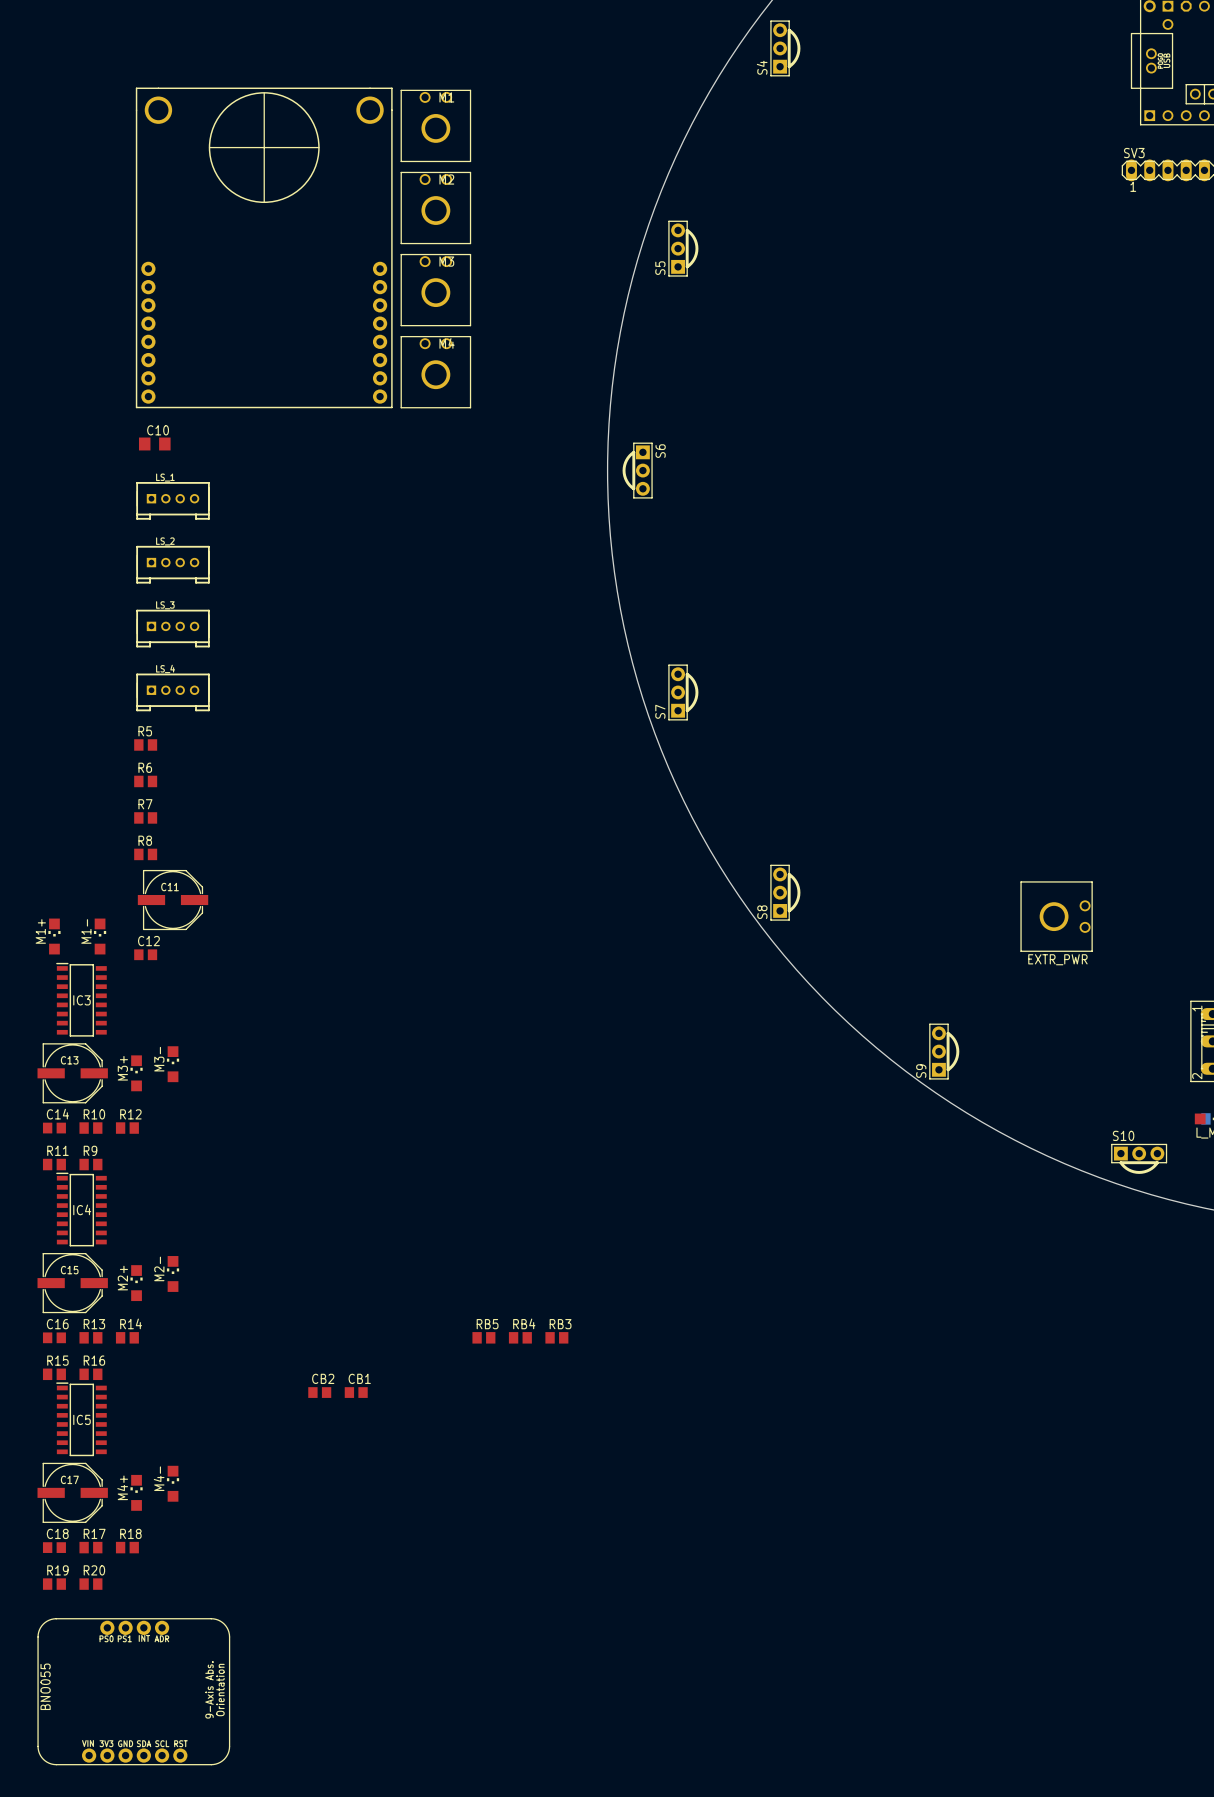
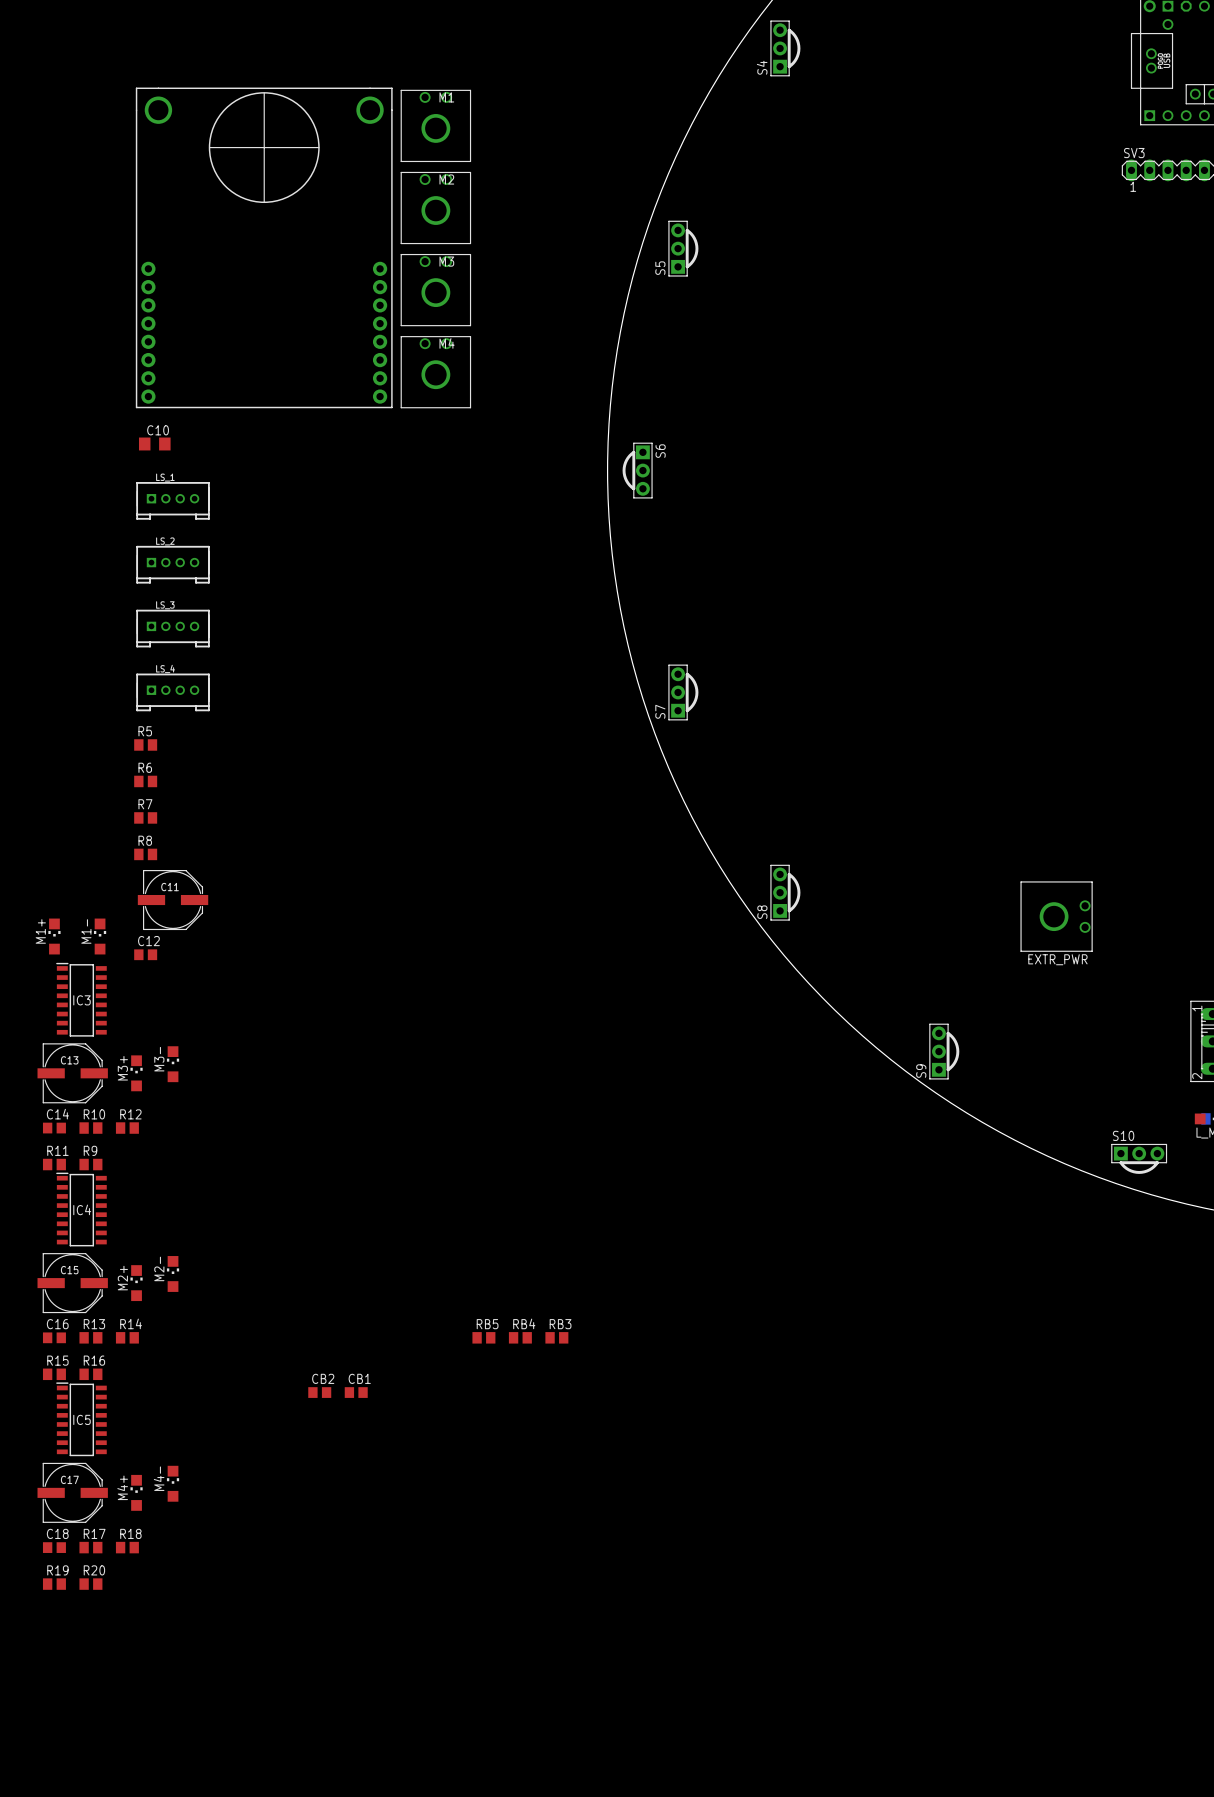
part: (133, 1691) -> none

